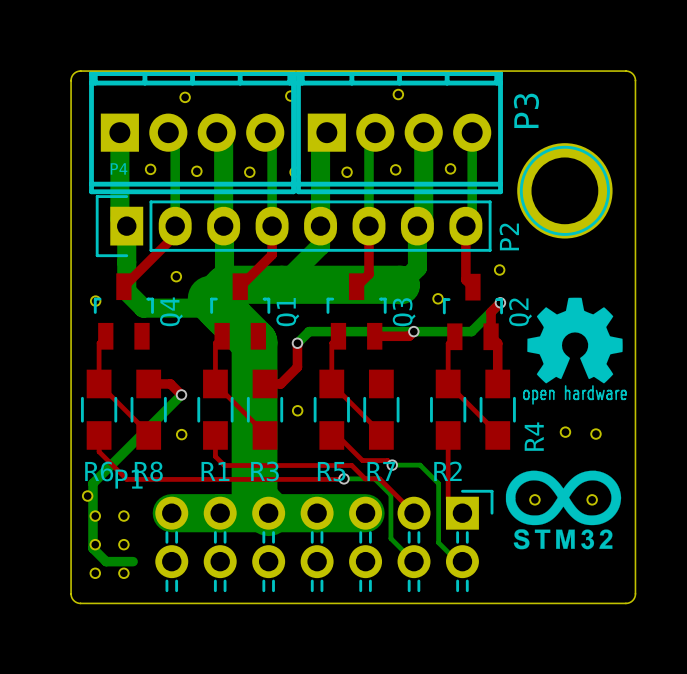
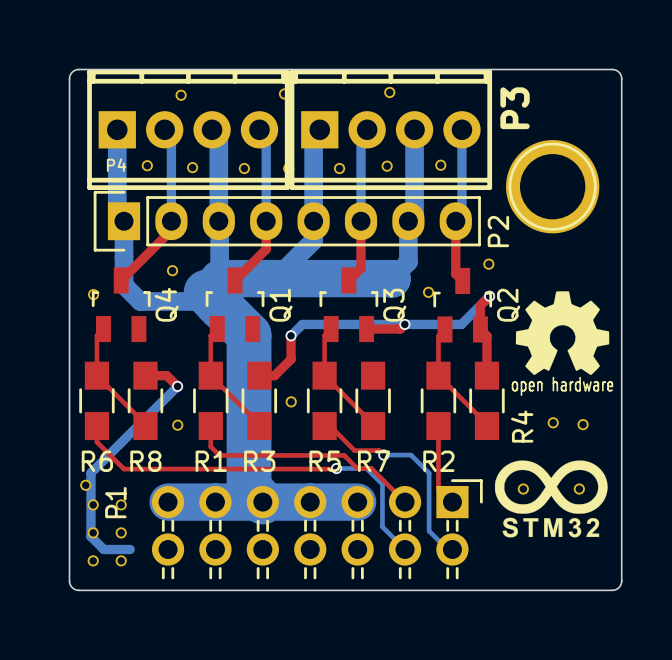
P1 name rotation: 0° (129, 479) -> 90° counterclockwise (115, 502)

